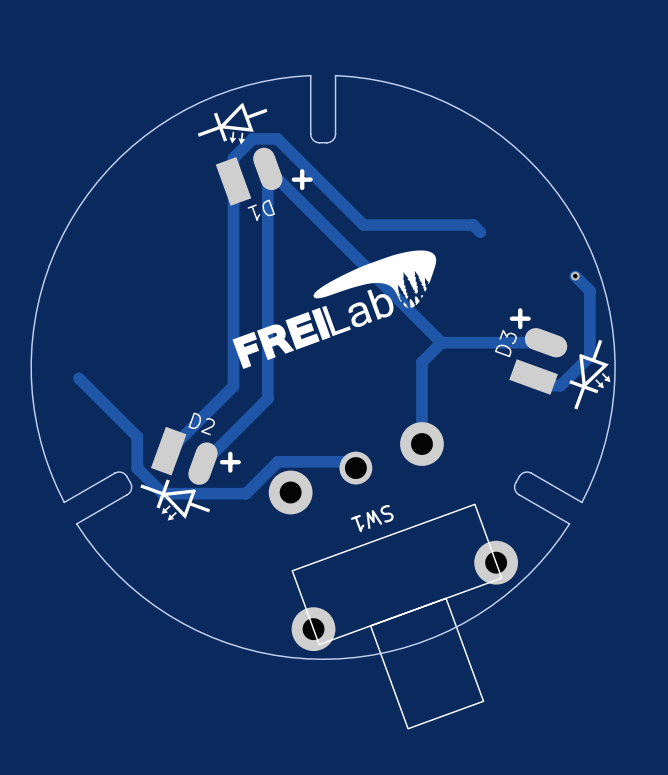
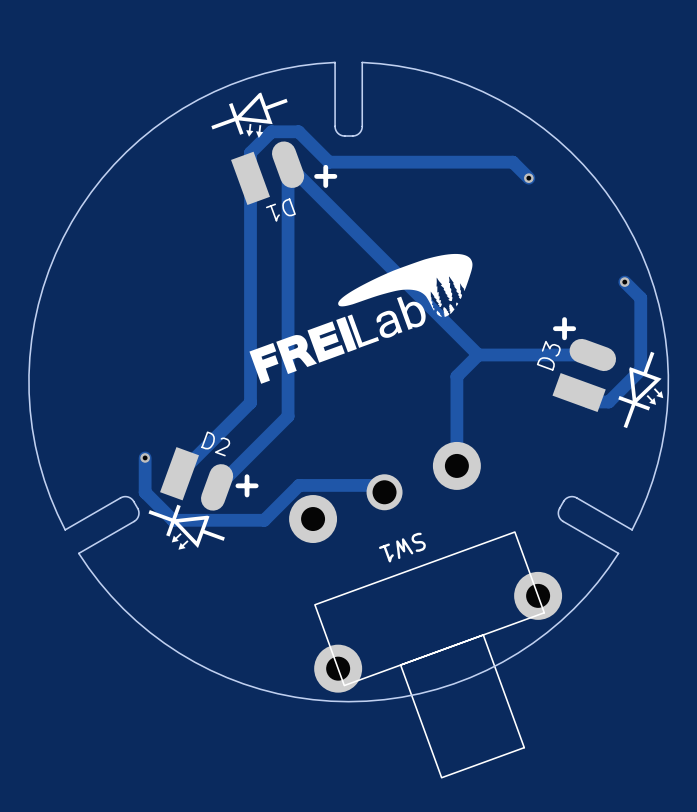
track: (305, 166) (363, 225) (473, 225) (480, 232) -> (328, 162) (512, 162) (528, 178)
via: none -> (528, 178)
track: (78, 378) (137, 436) -> none
via: none -> (145, 457)

